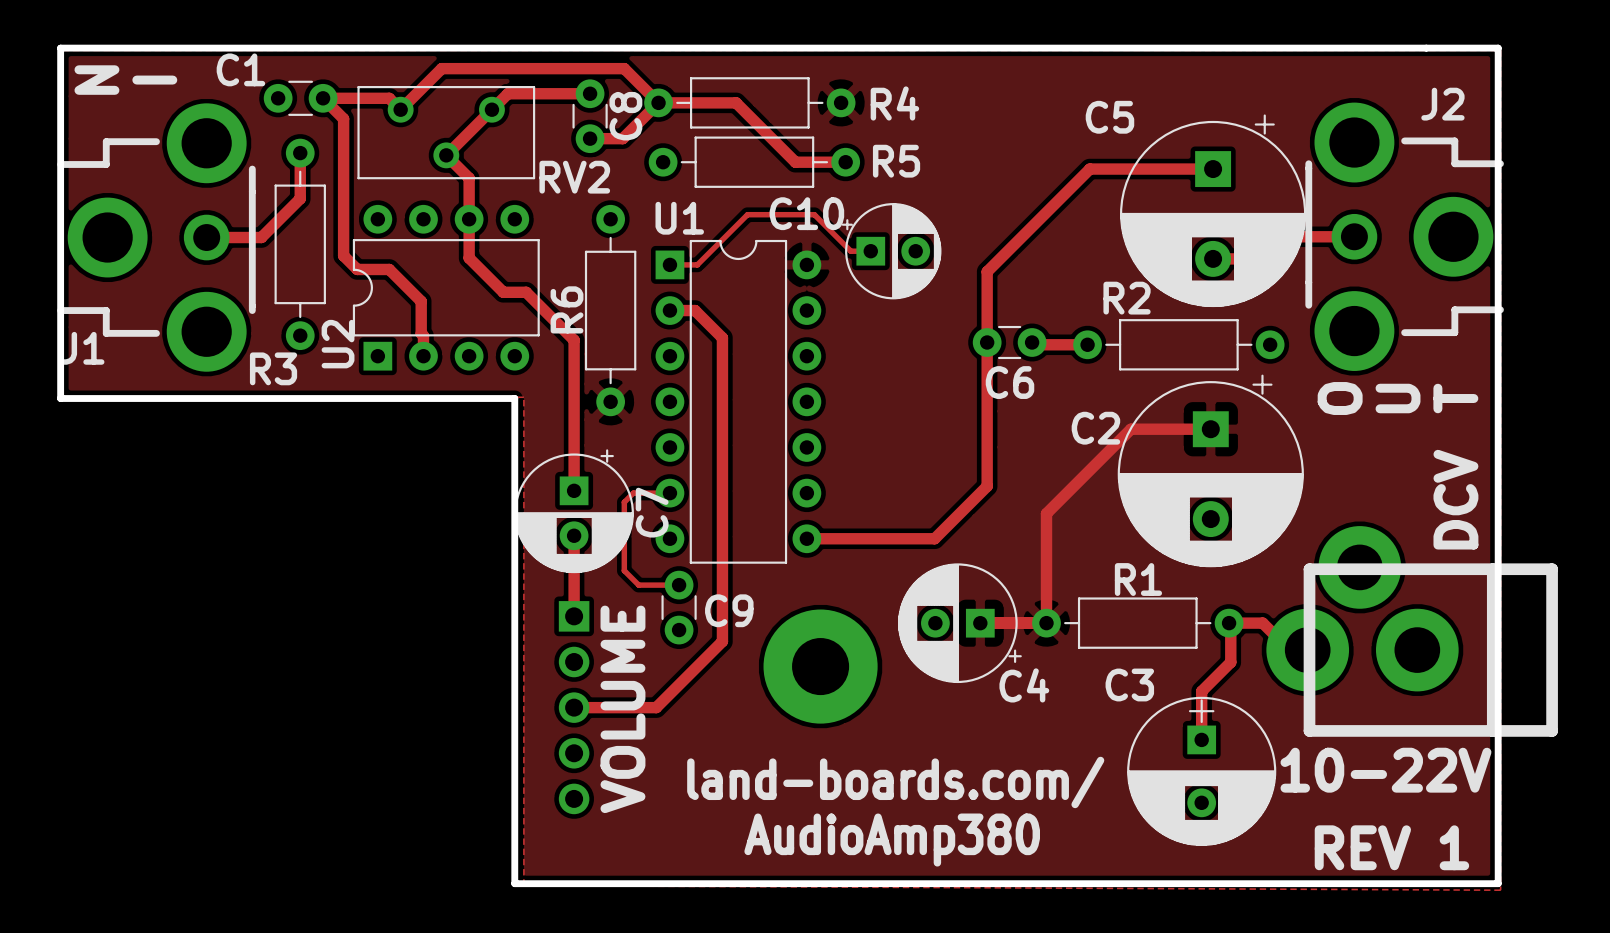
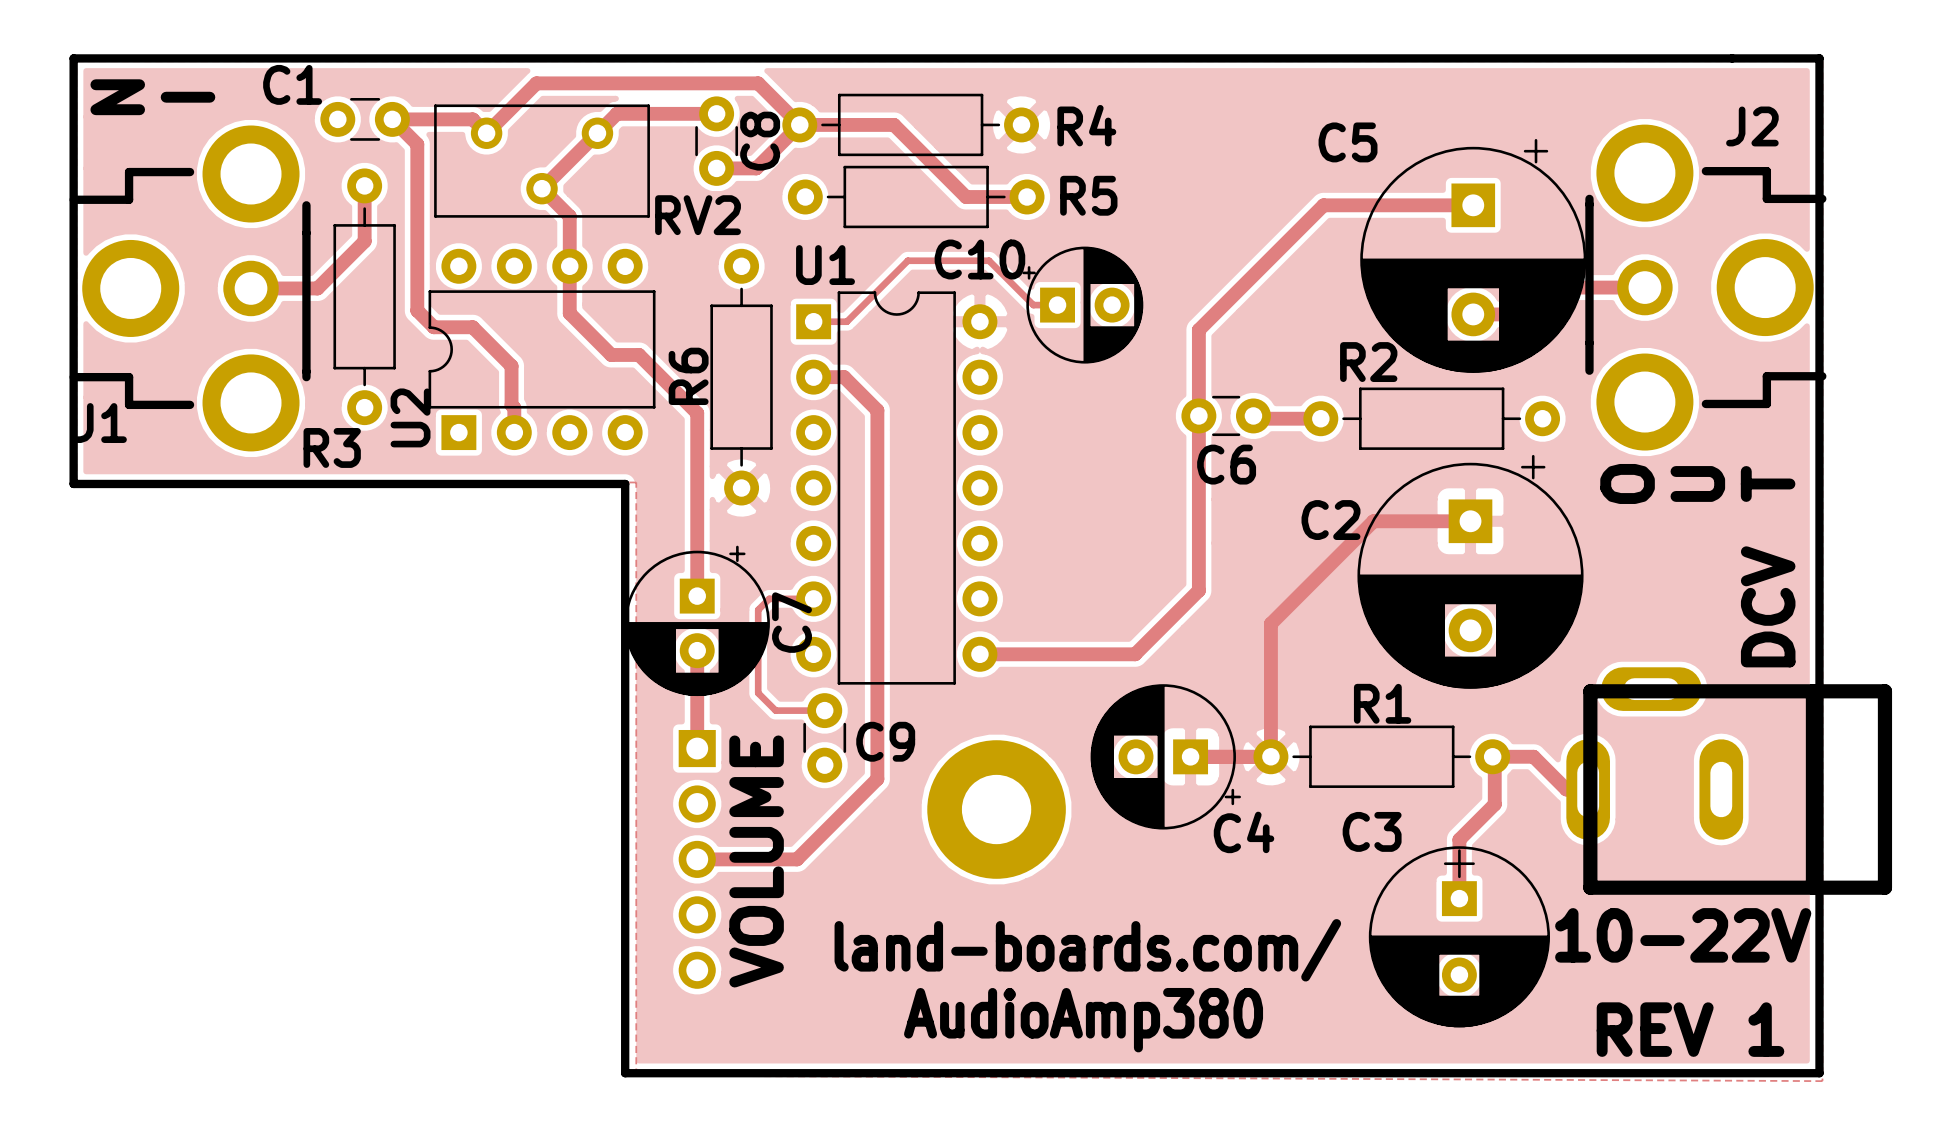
part footprint: [1266, 526, 1558, 737] -> [1566, 667, 1893, 895]

